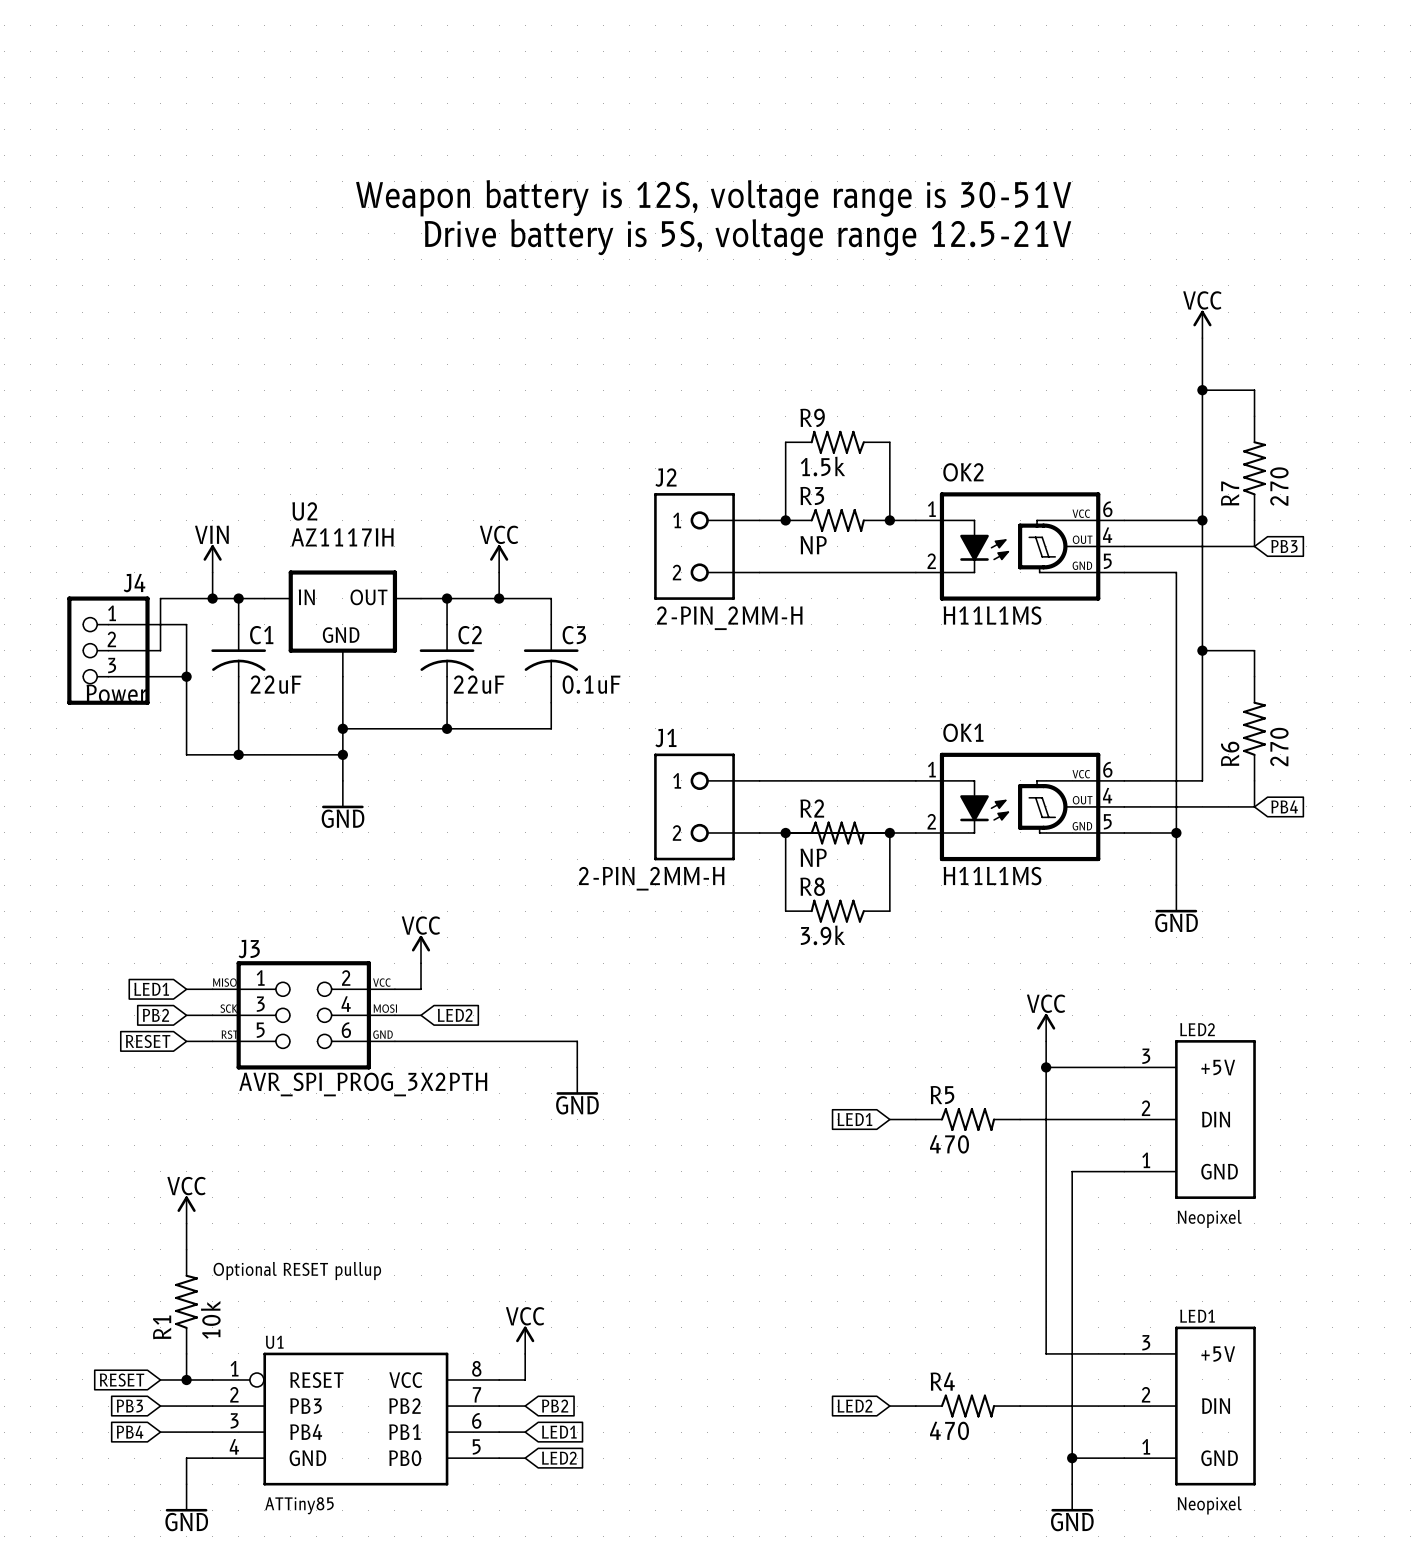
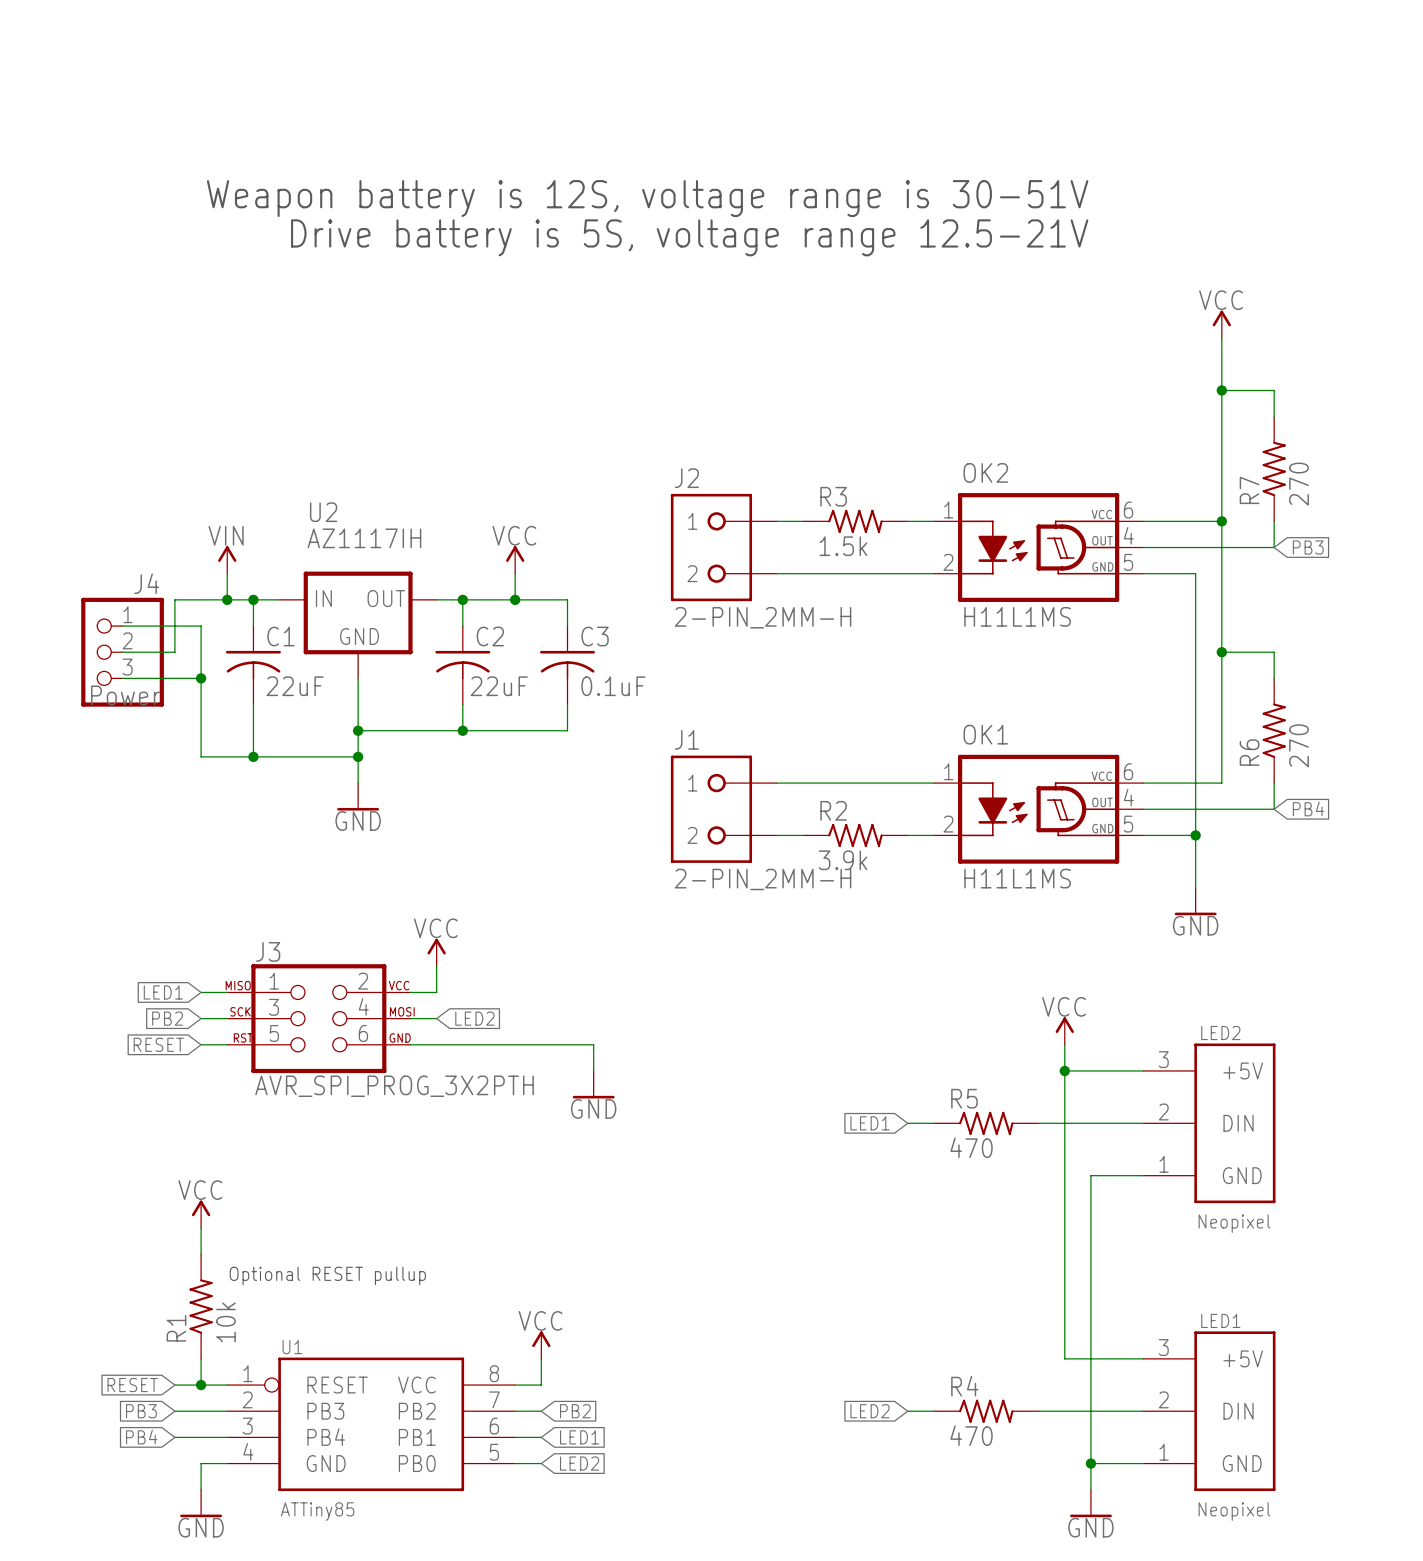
wire: (785, 442) (785, 520) -> none
R9: 1.5k (837, 442) -> none
wire: (889, 442) (889, 520) -> none
junction: (785, 520) -> none
junction: (889, 520) -> none
R3 value: NP (813, 545) -> 1.5k (843, 546)
junction: (785, 832) -> none
junction: (889, 832) -> none
R2 value: NP (813, 857) -> 3.9k (843, 860)
J1 value position: 2-PIN_2MM-H (651, 878) -> 2-PIN_2MM-H (763, 879)
wire: (785, 911) (785, 832) (889, 832) (889, 911) -> none
R8: 3.9k (837, 911) -> none

